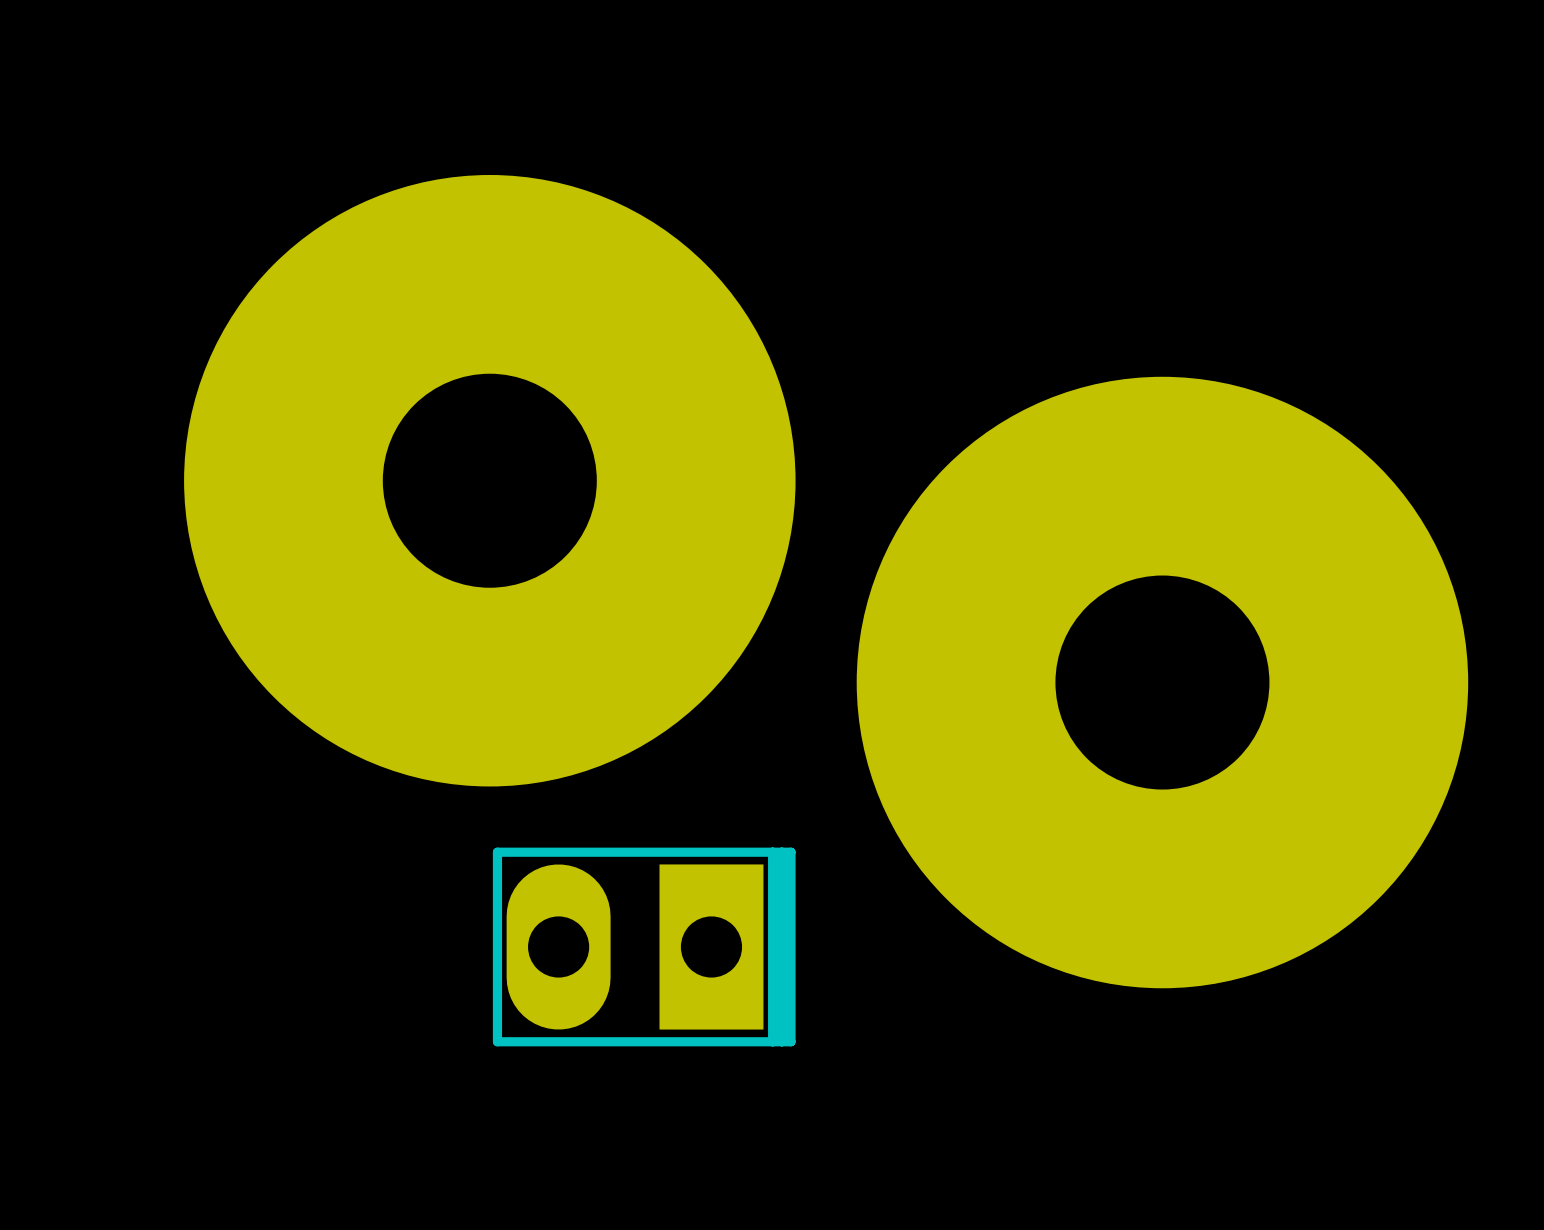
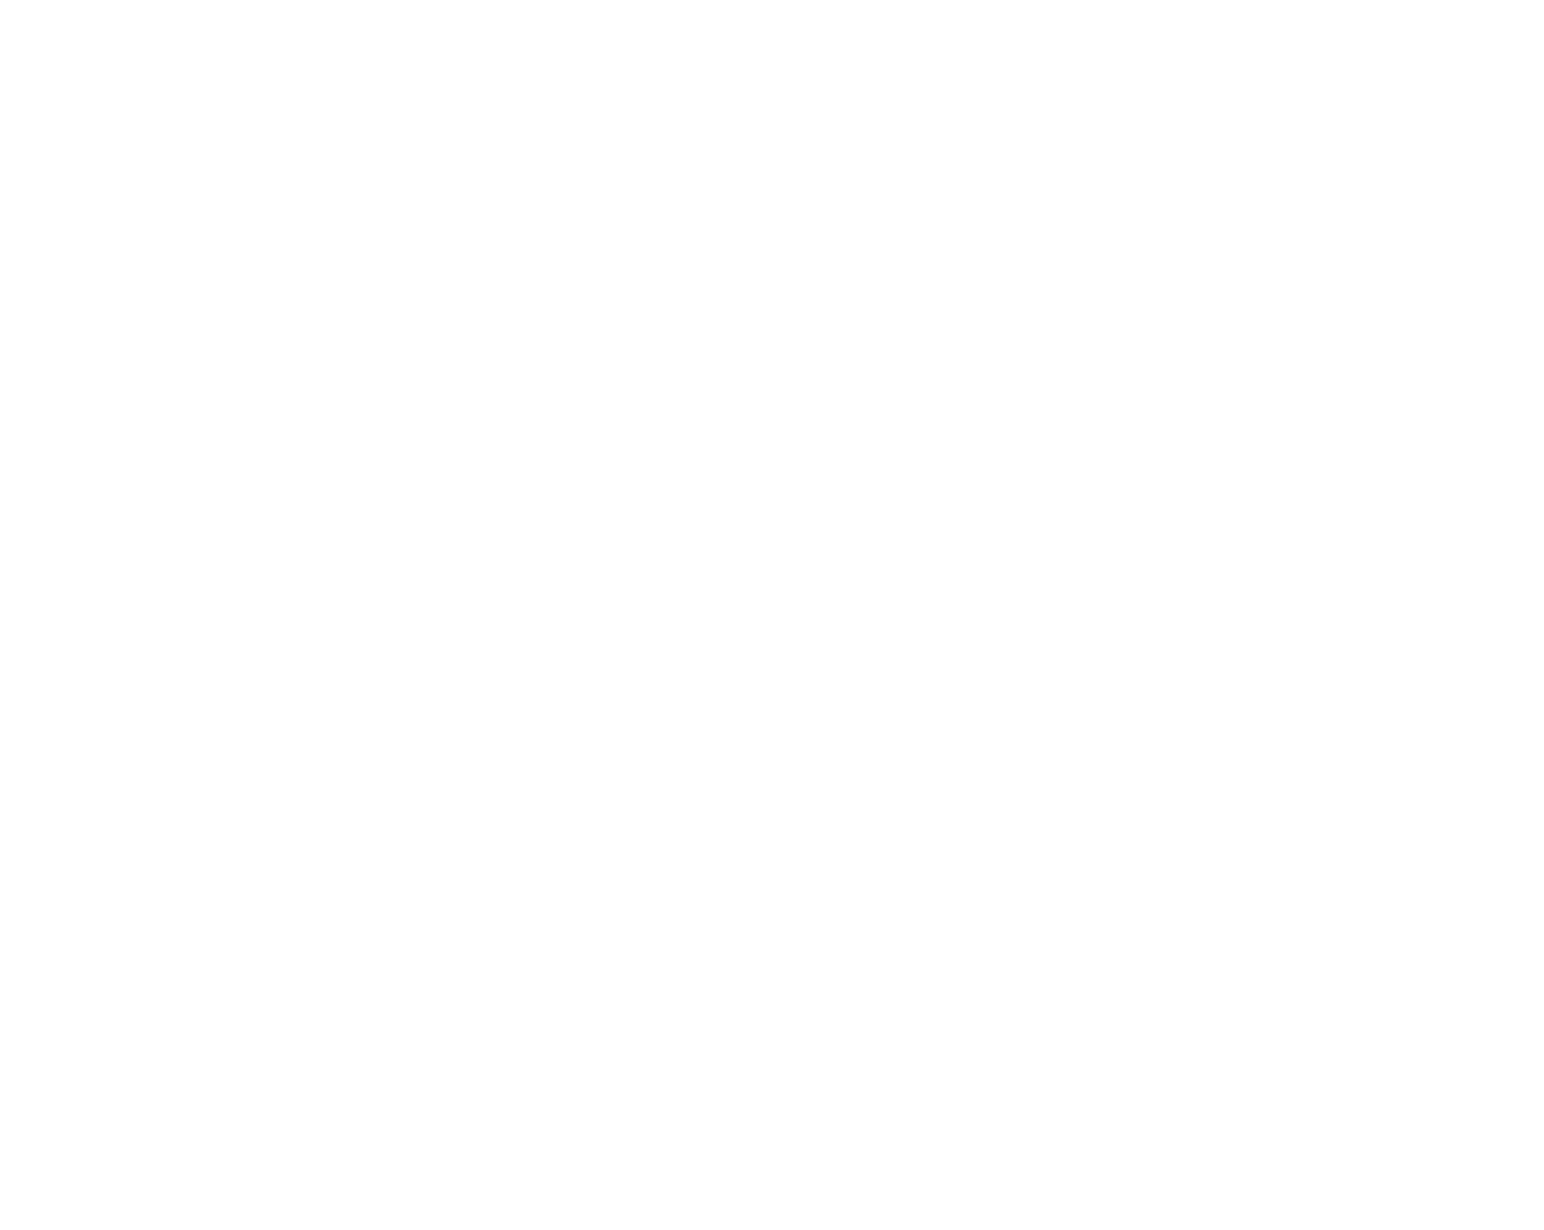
part: (489, 480) -> none
part: (1162, 682) -> none
part: (644, 946) -> none

